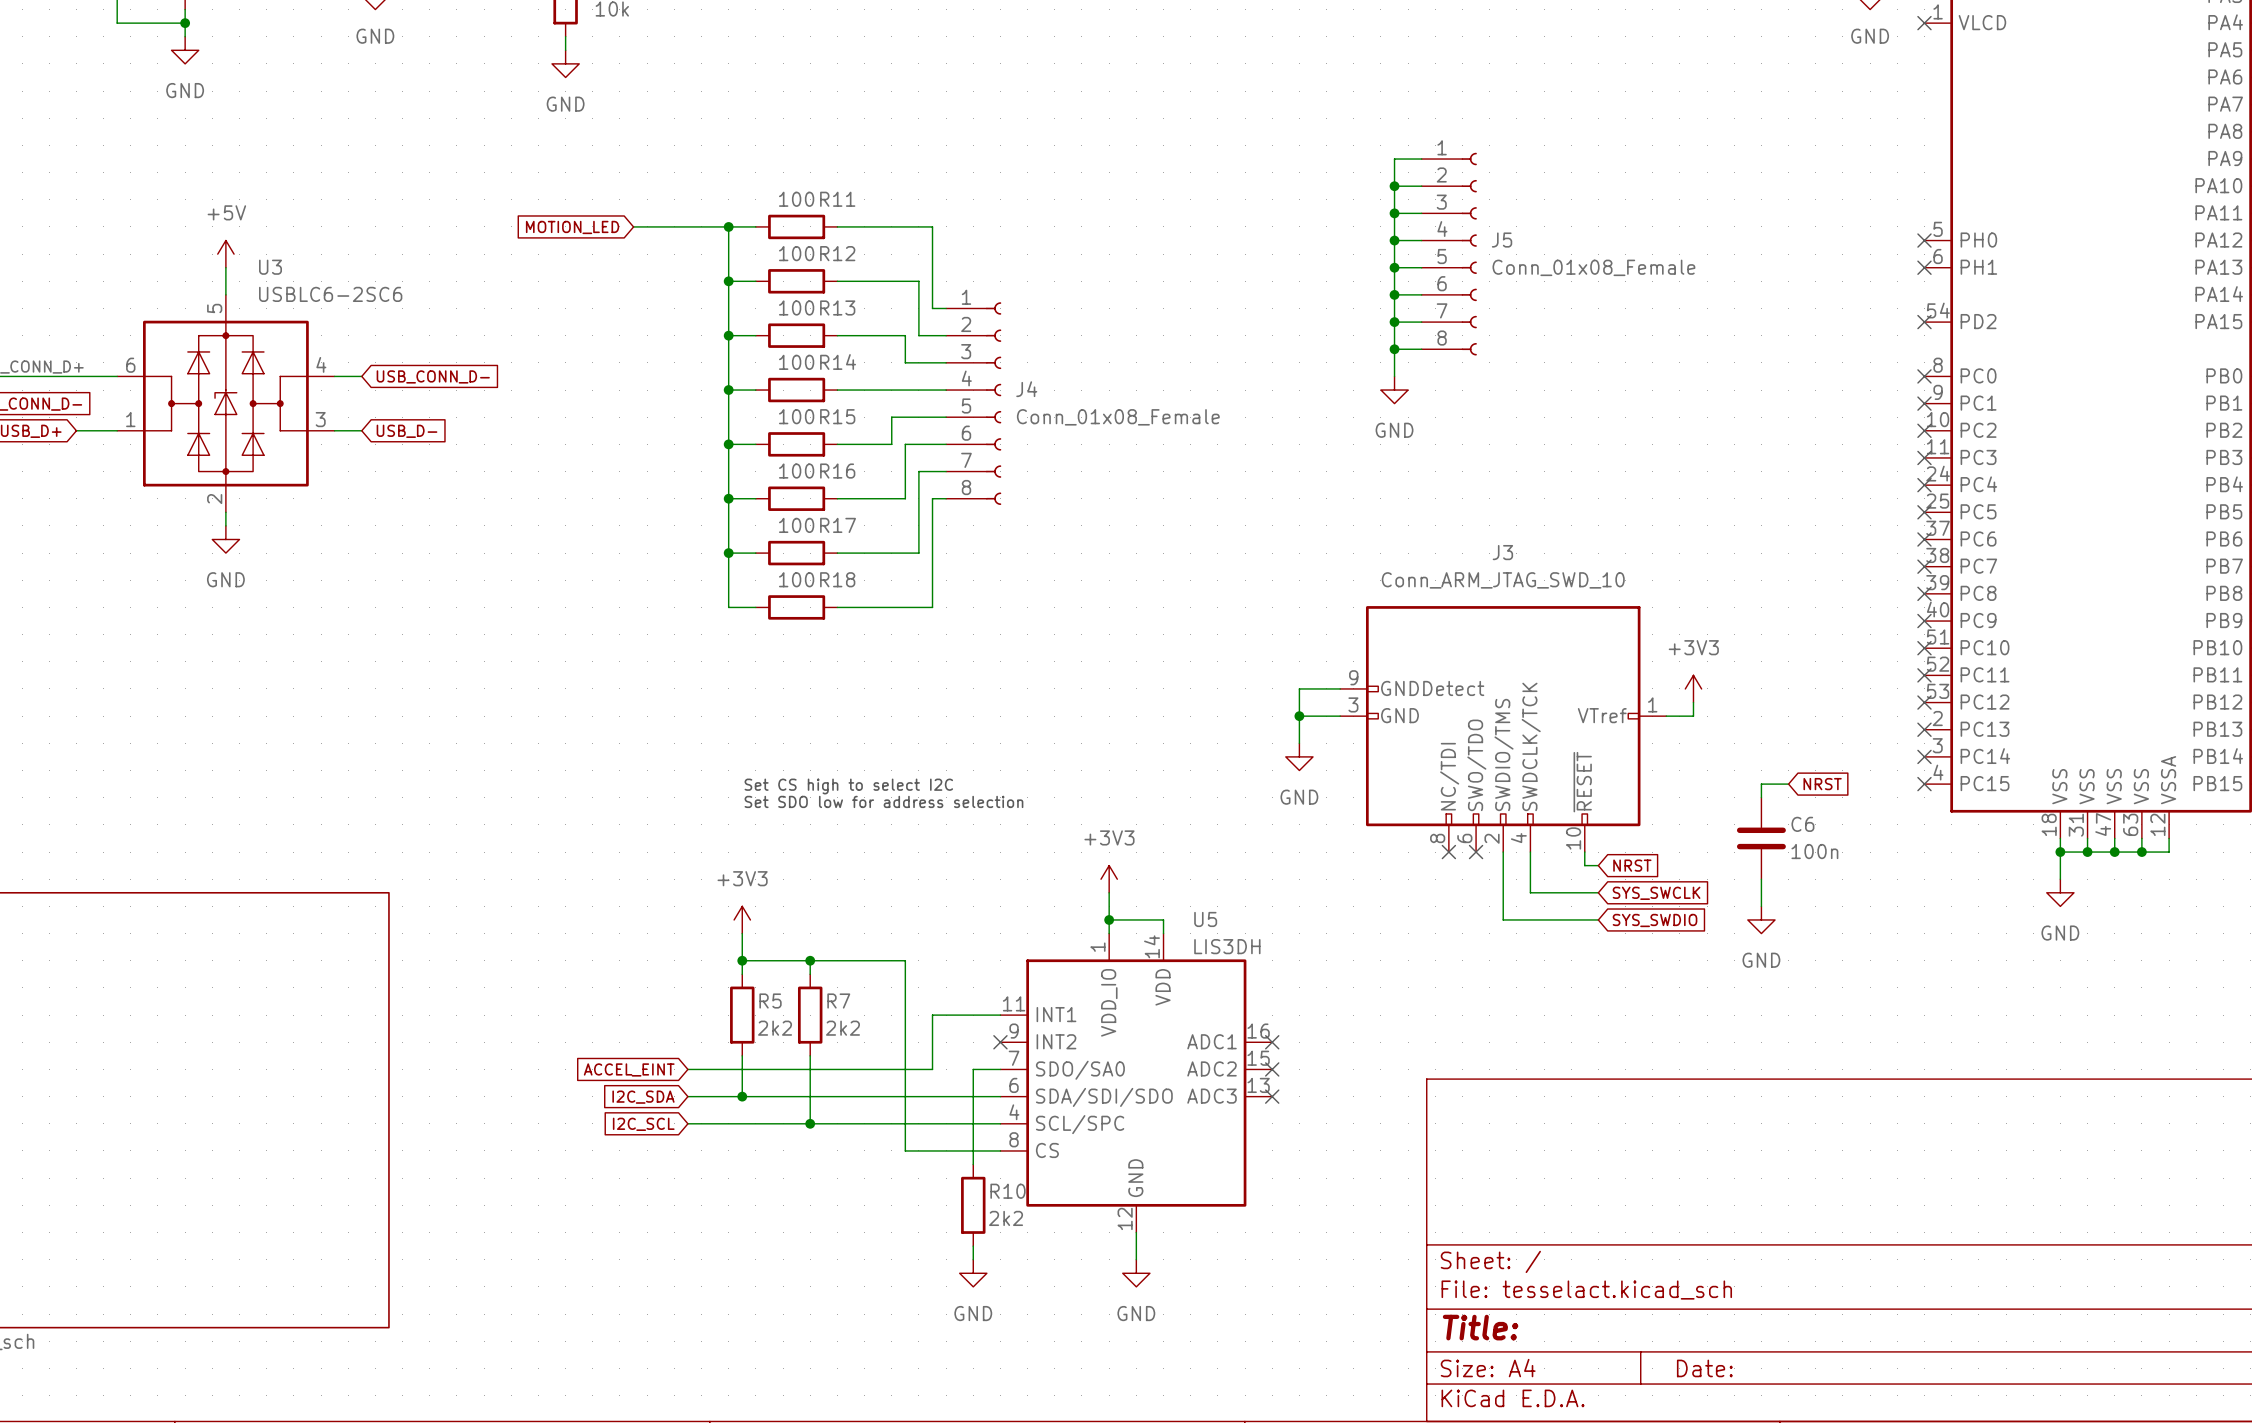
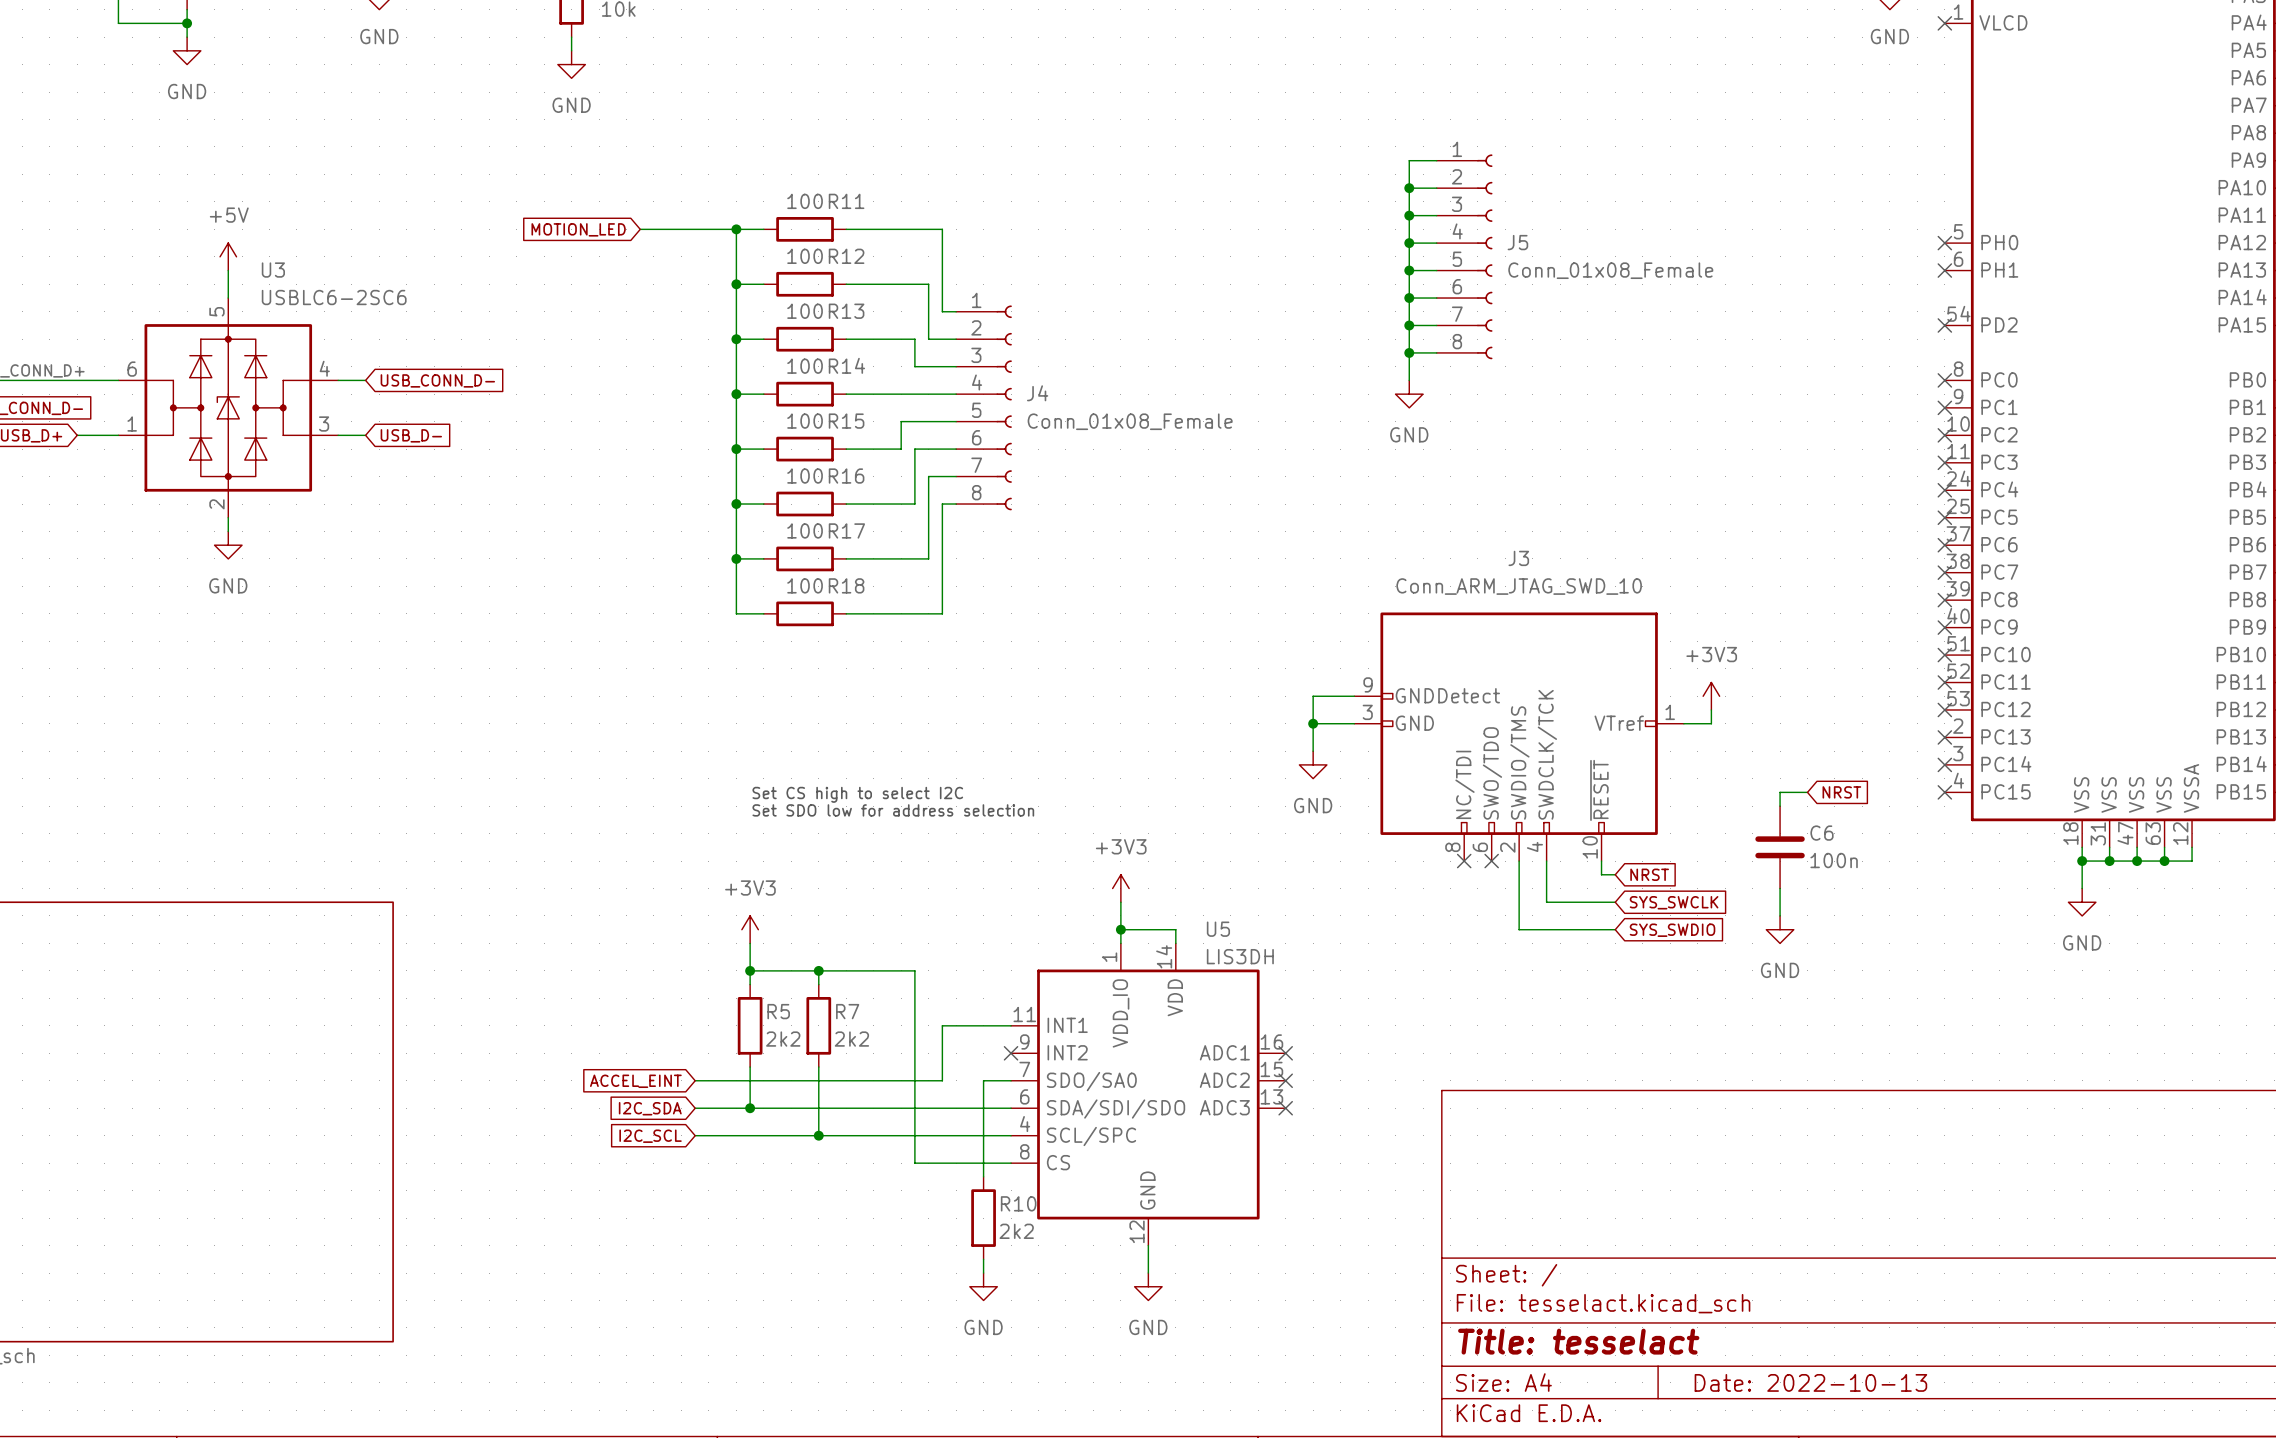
title block: Title: (1480, 1327) -> Title: tesselact (1578, 1341)
title block: Date: (1704, 1368) -> Date: 2022-10-13 (1810, 1382)

